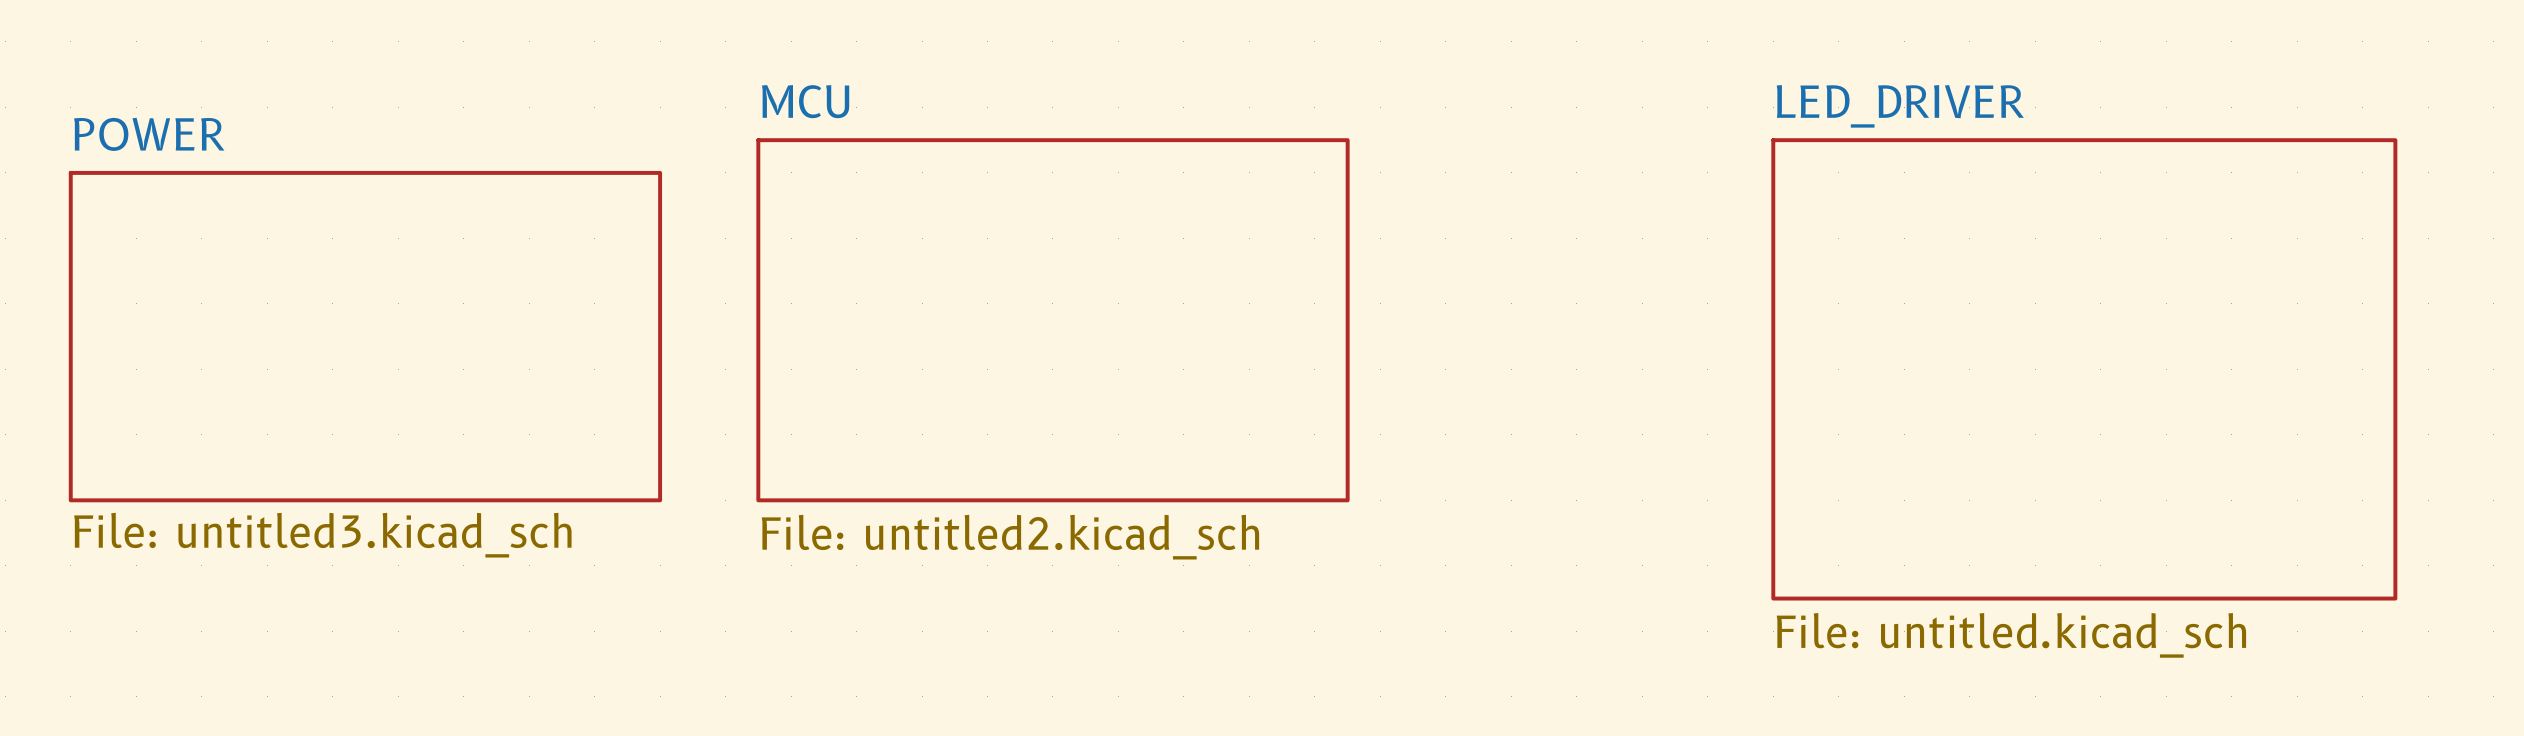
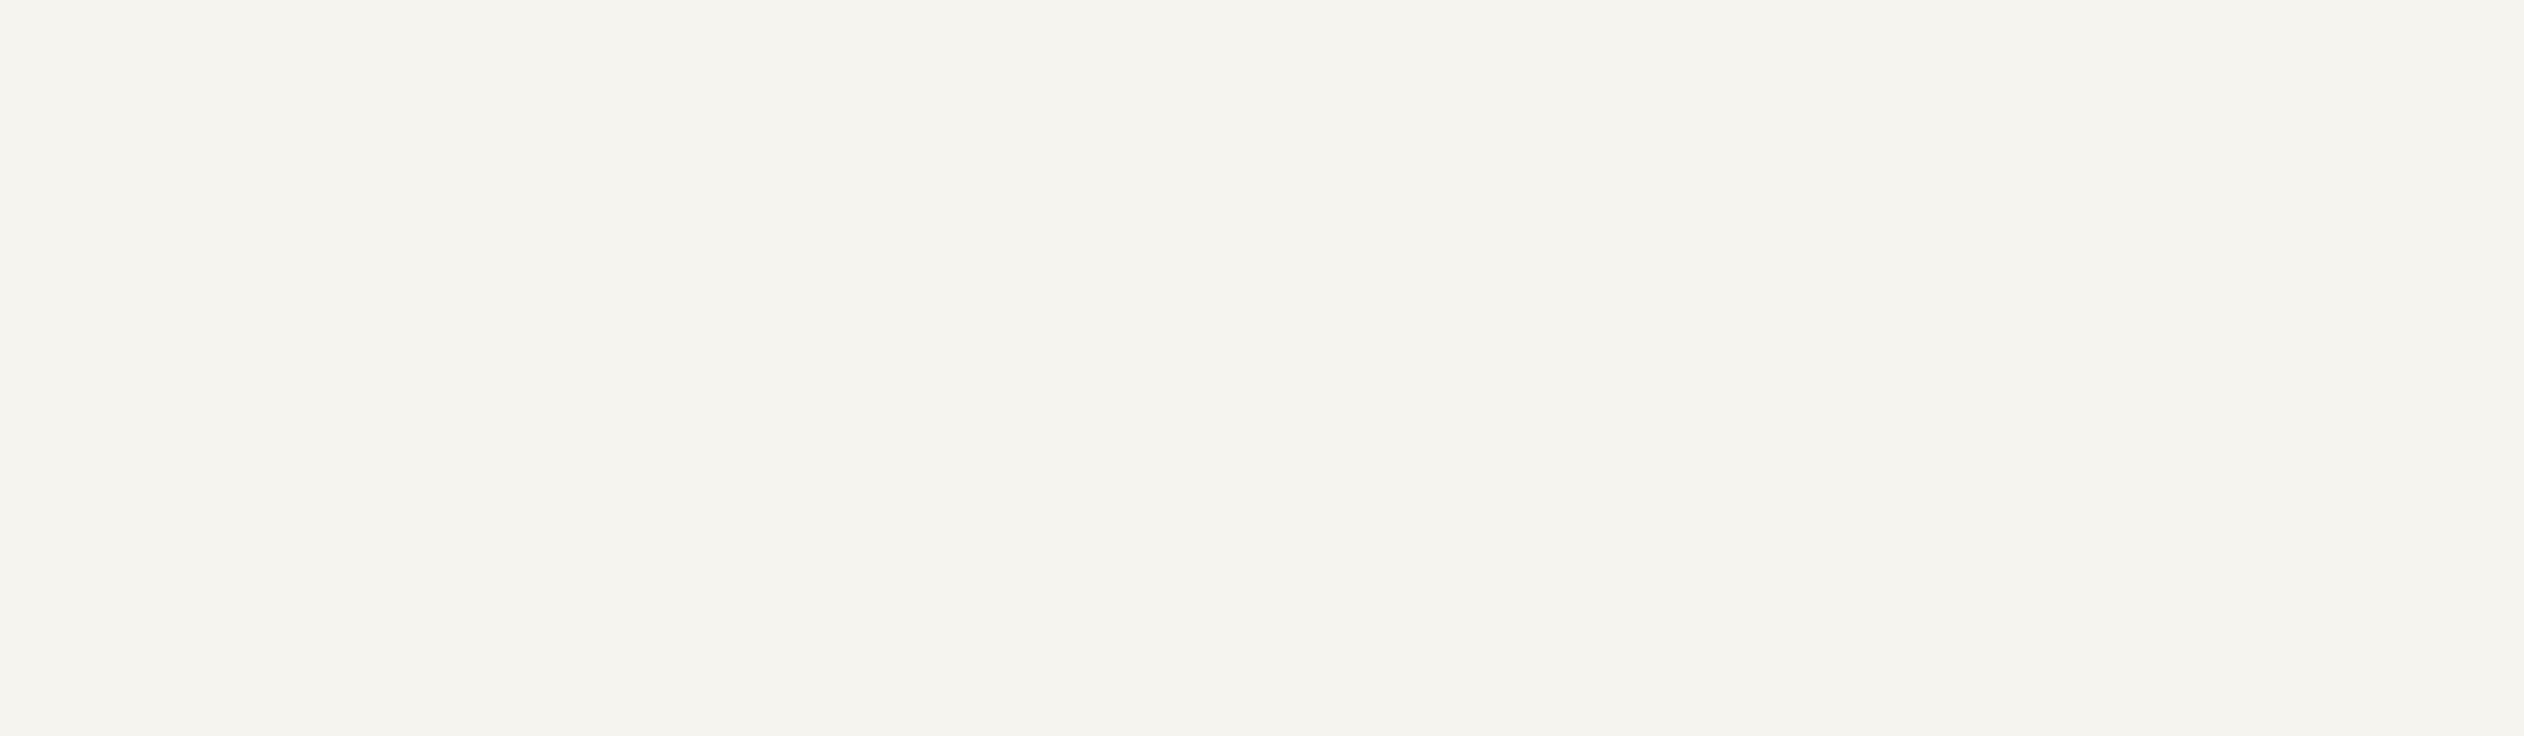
sheet MCU: File: untitled2.kicad_sch (1052, 320) -> none
sheet POWER: File: untitled3.kicad_sch (365, 336) -> none
sheet LED_DRIVER: File: untitled.kicad_sch (2084, 369) -> none

